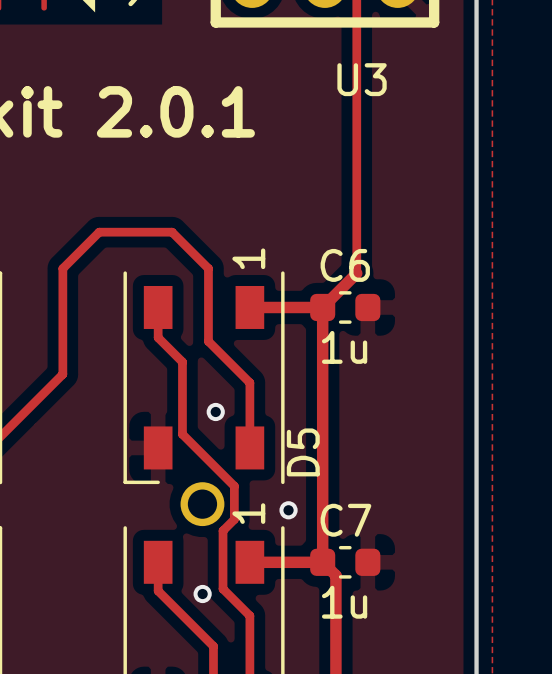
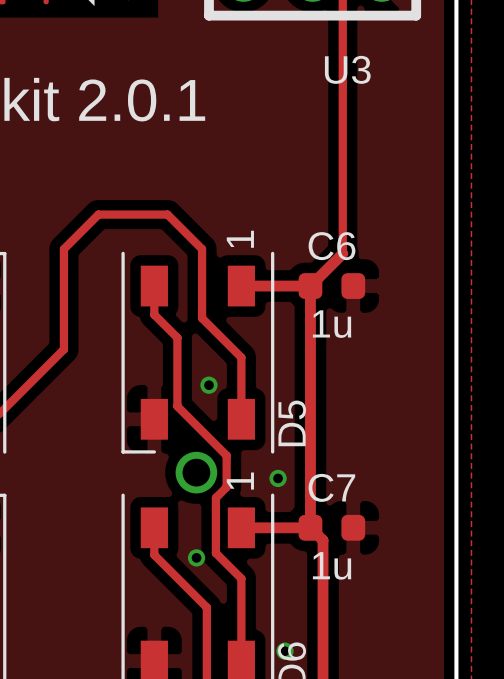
C6 footprint: [310, 291, 381, 324] -> [298, 273, 366, 299]
C7 footprint: [310, 545, 381, 579] -> [298, 514, 366, 541]

